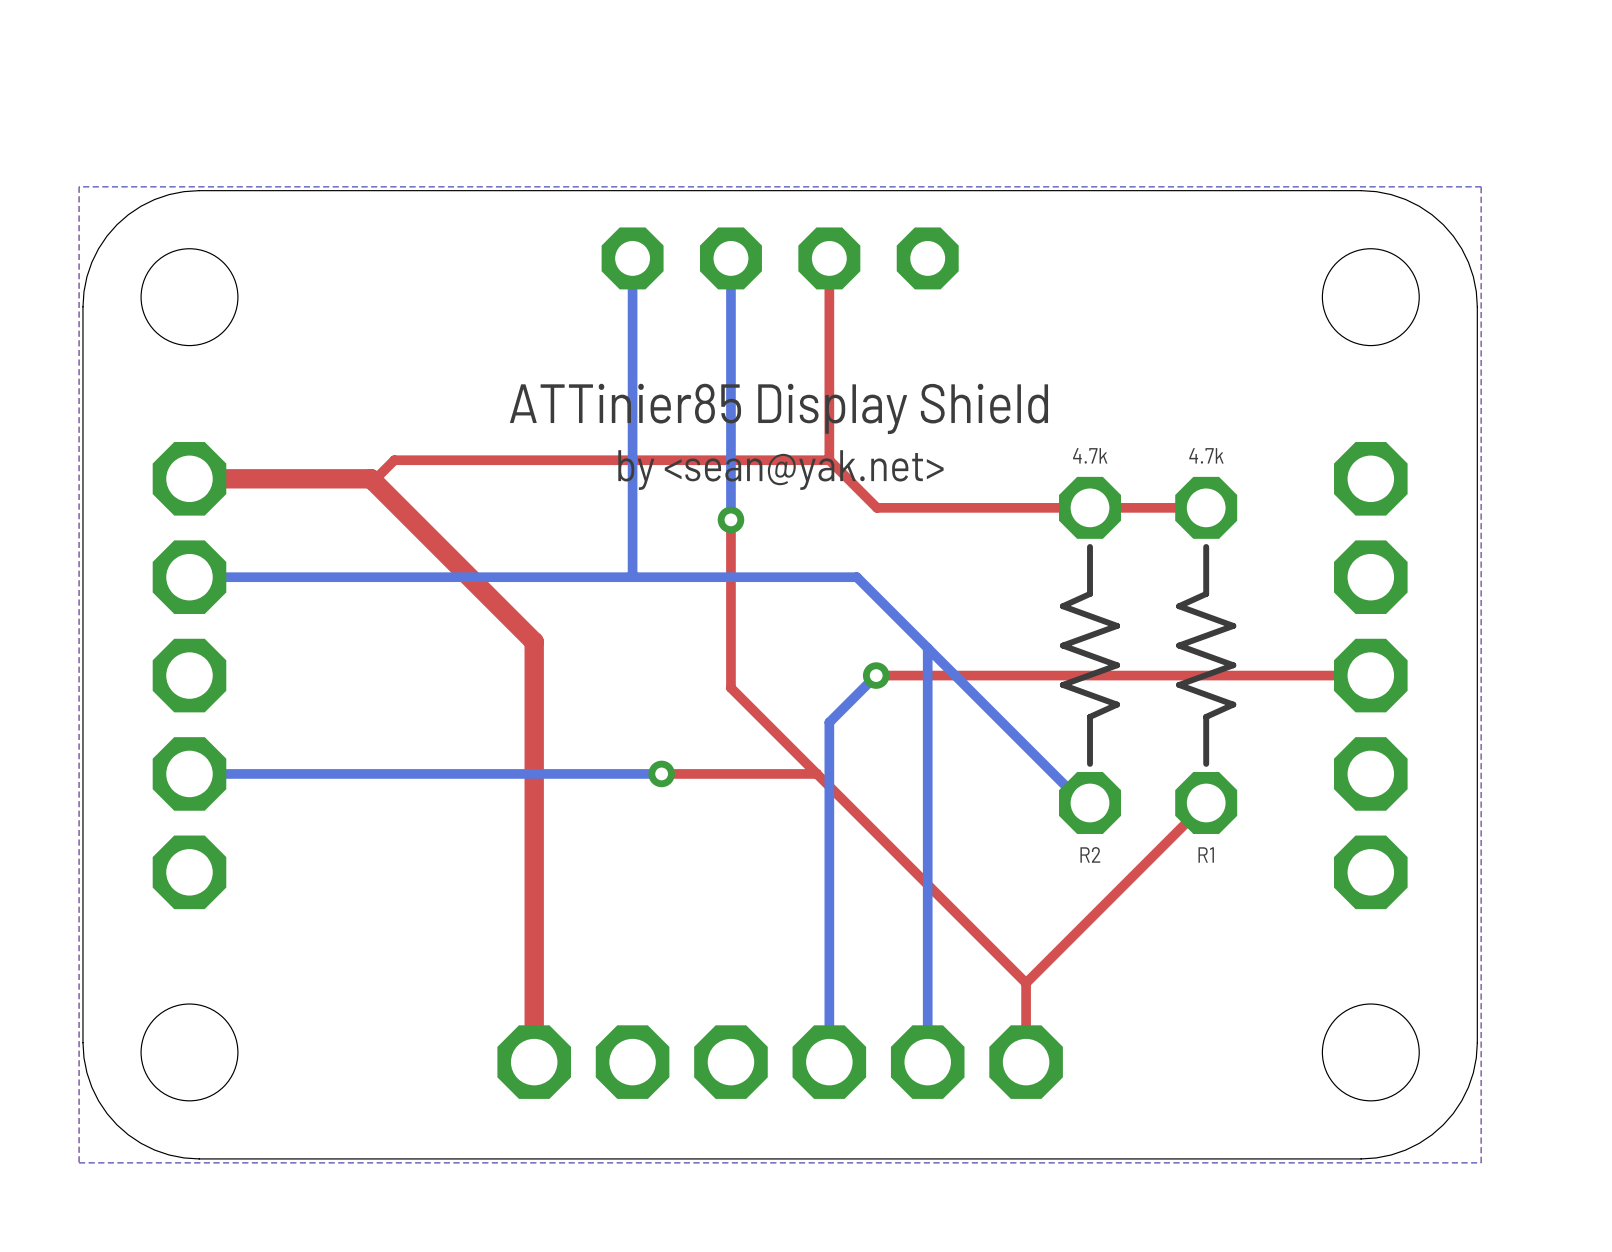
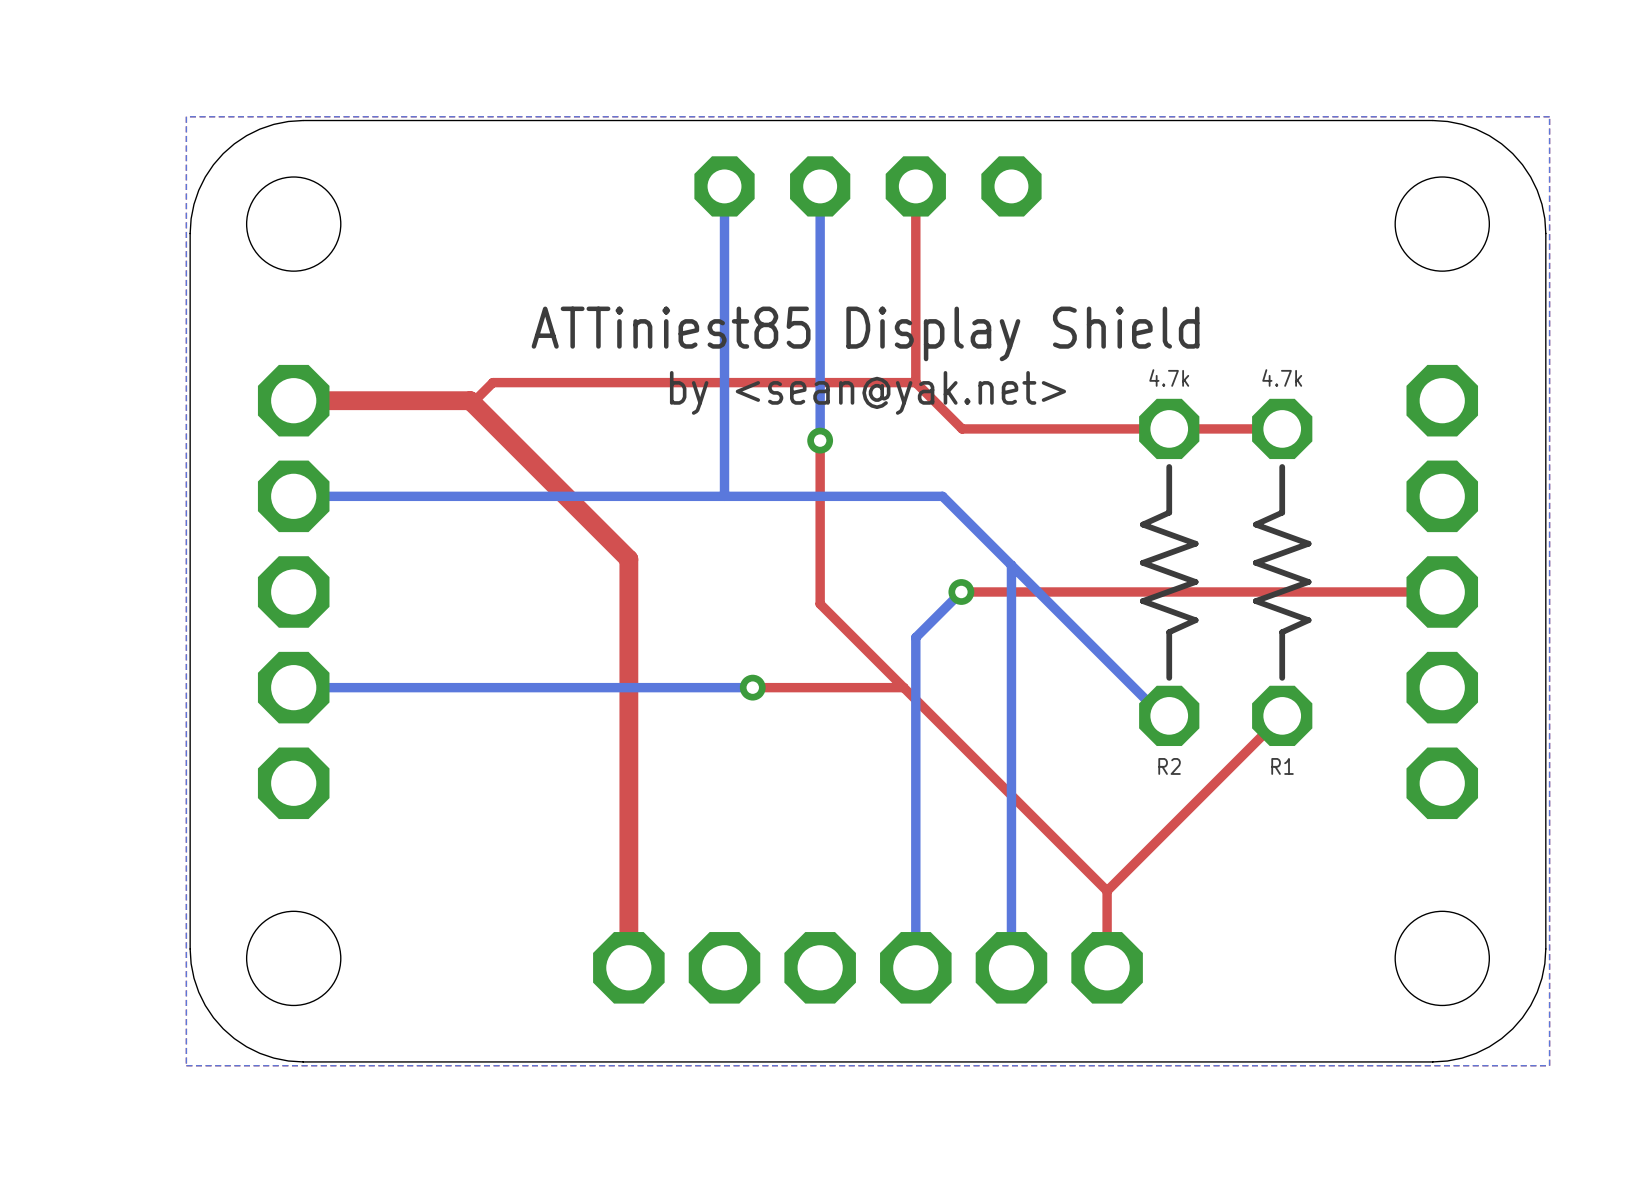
text: ATTinier85 Display Shield (778, 408) -> ATTiniest85 Display Shield (865, 333)

